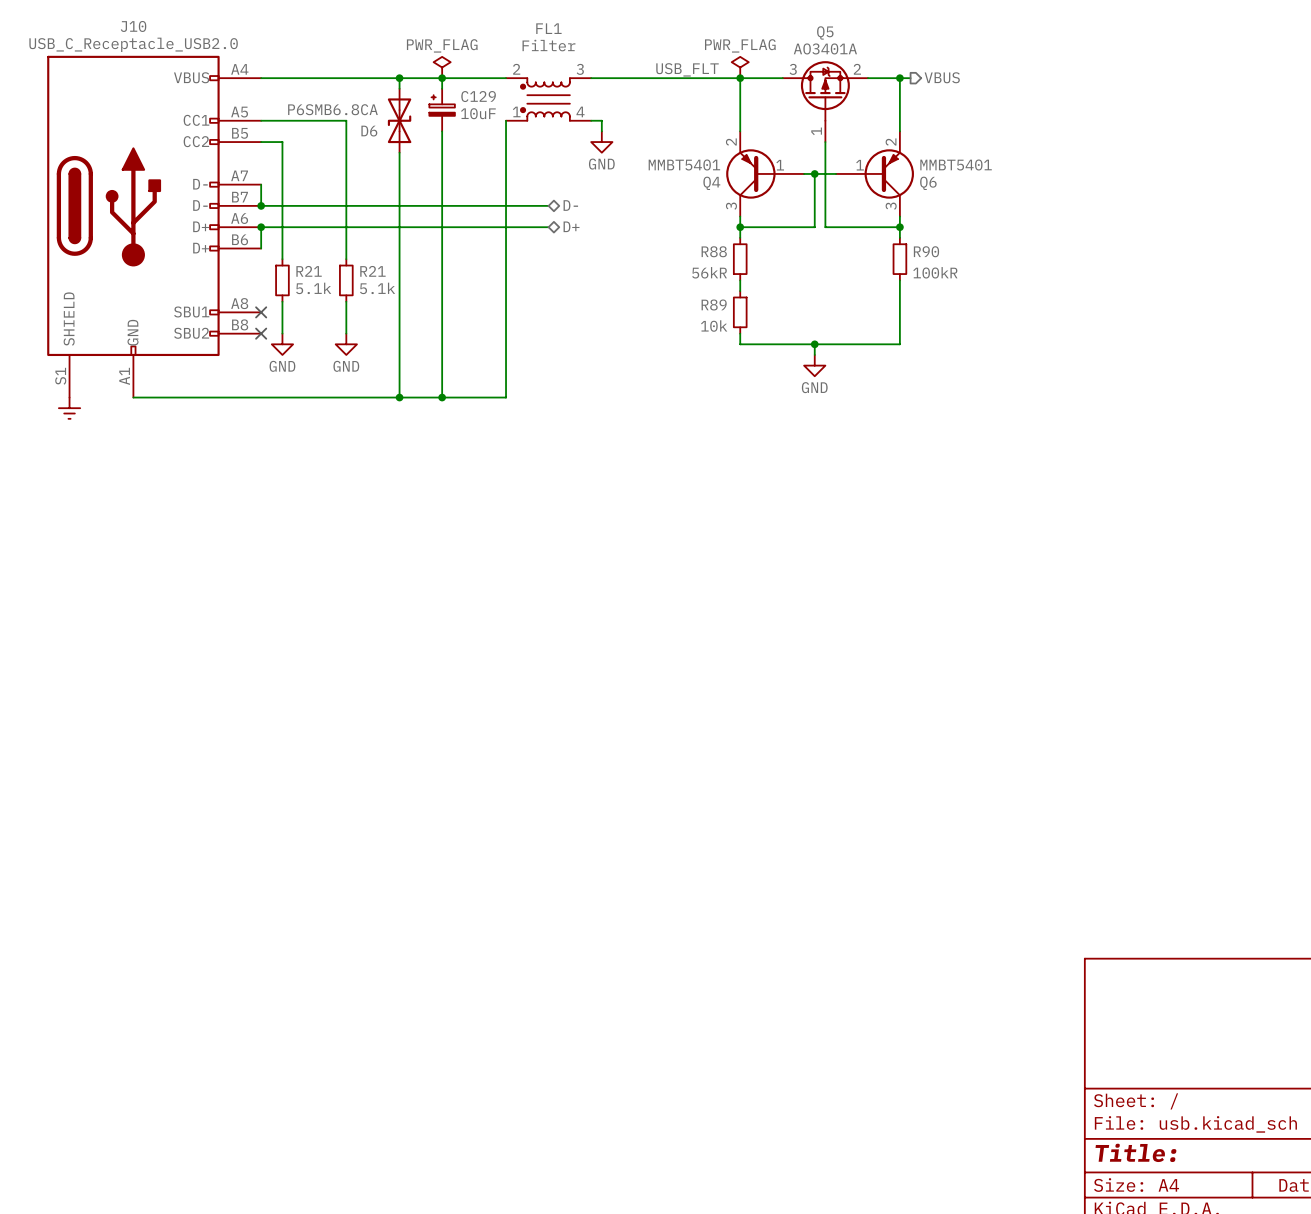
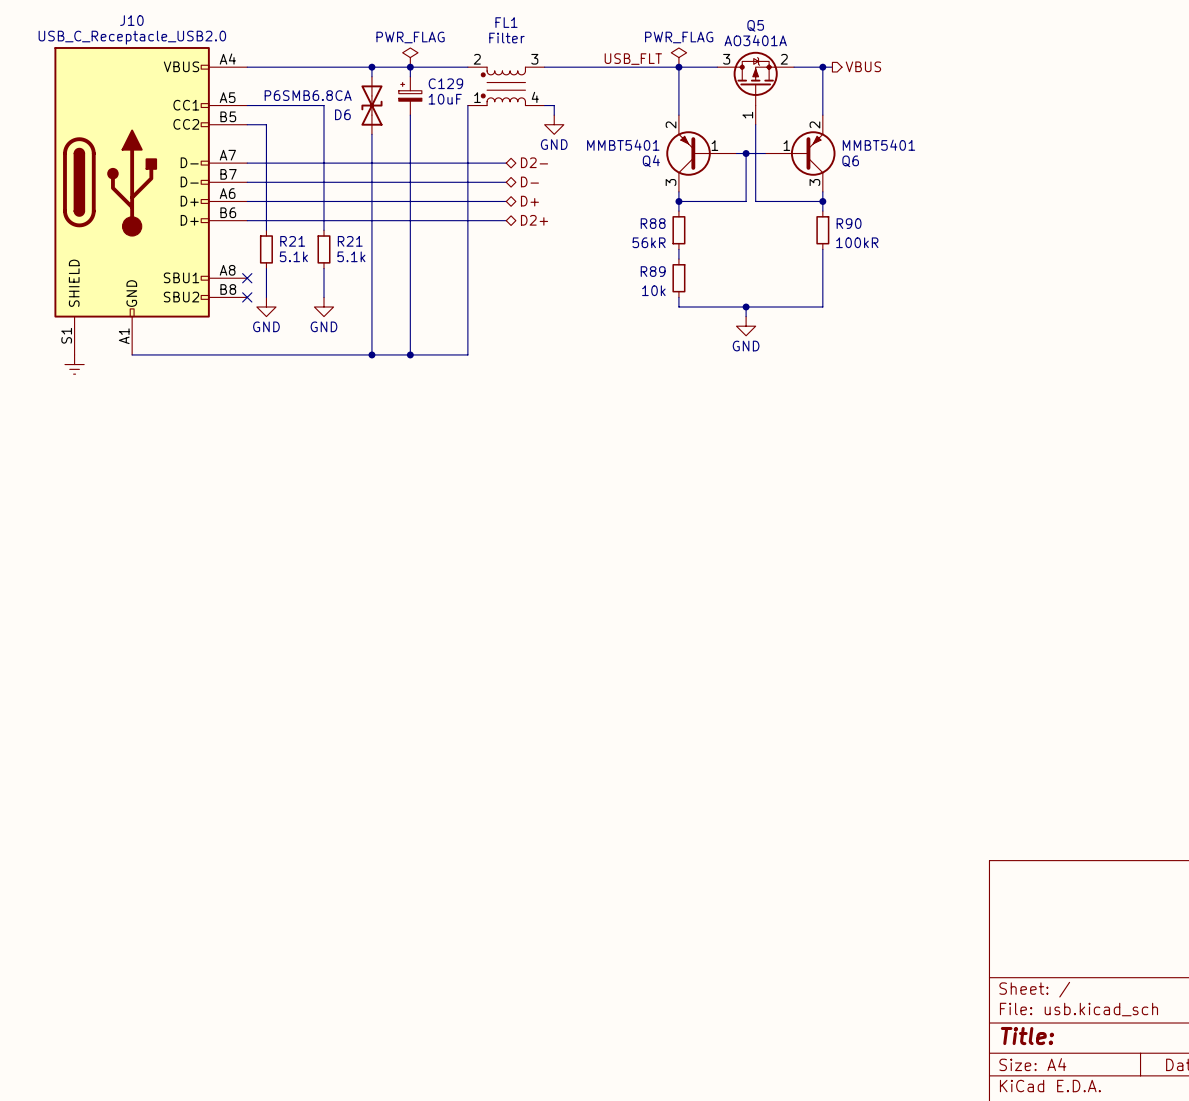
wire: (261, 184) (261, 205) -> (247, 163) (506, 163)
hierarchical label: none -> D2- (534, 162)
junction: (261, 205) -> none
wire: (261, 227) (261, 248) -> (506, 220) (247, 220)
junction: (261, 227) -> none
hierarchical label: none -> D2+ (534, 220)

